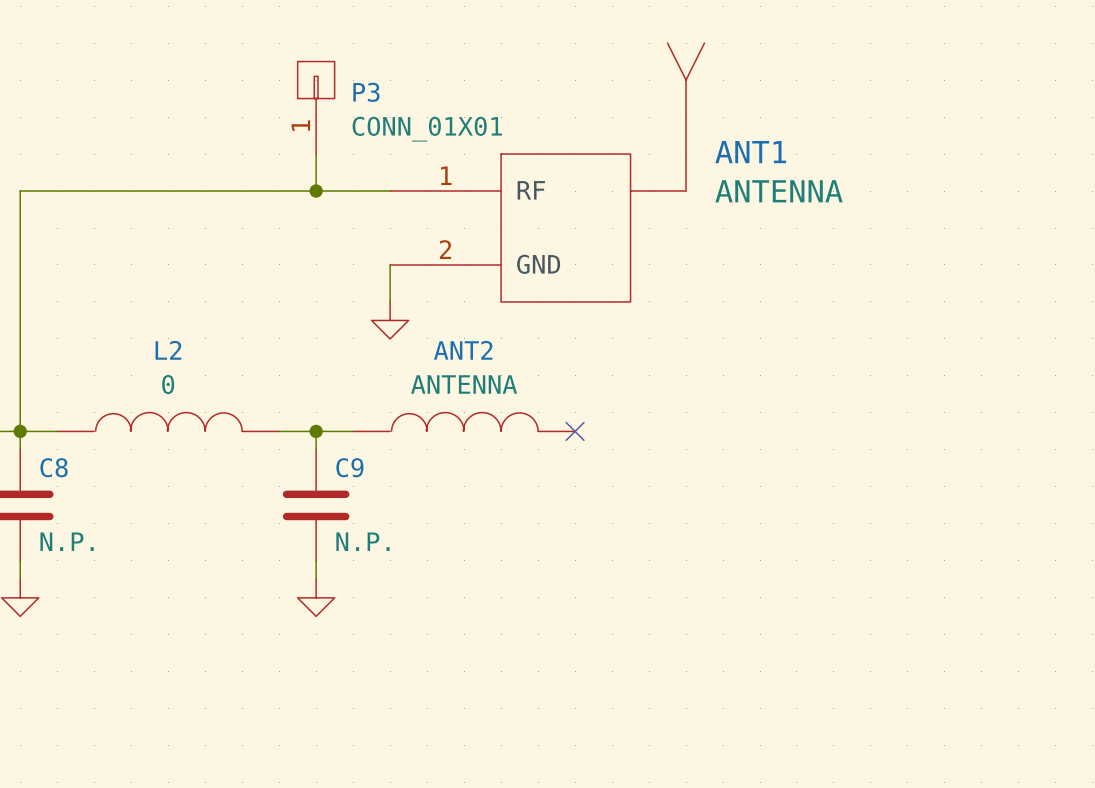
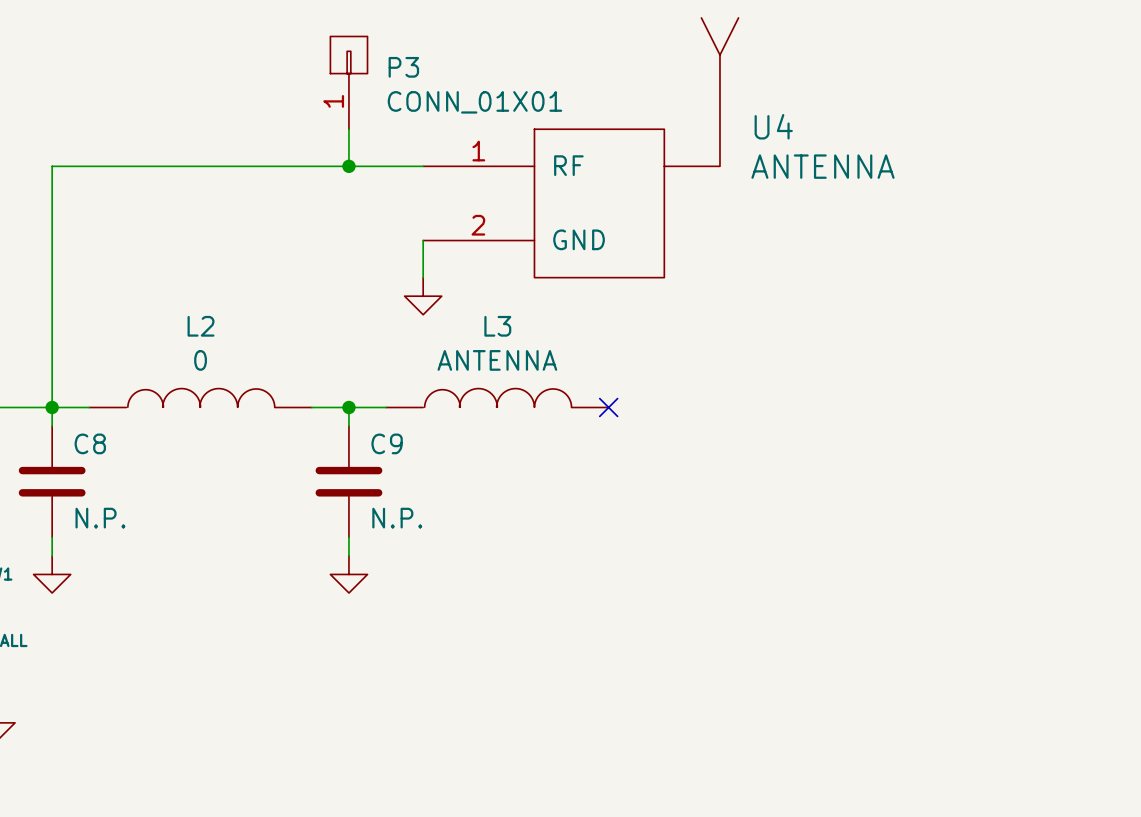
ANT1 name: ANT1 (750, 152) -> U4 (773, 126)
ANT2 name: ANT2 (463, 350) -> L3 (497, 326)

